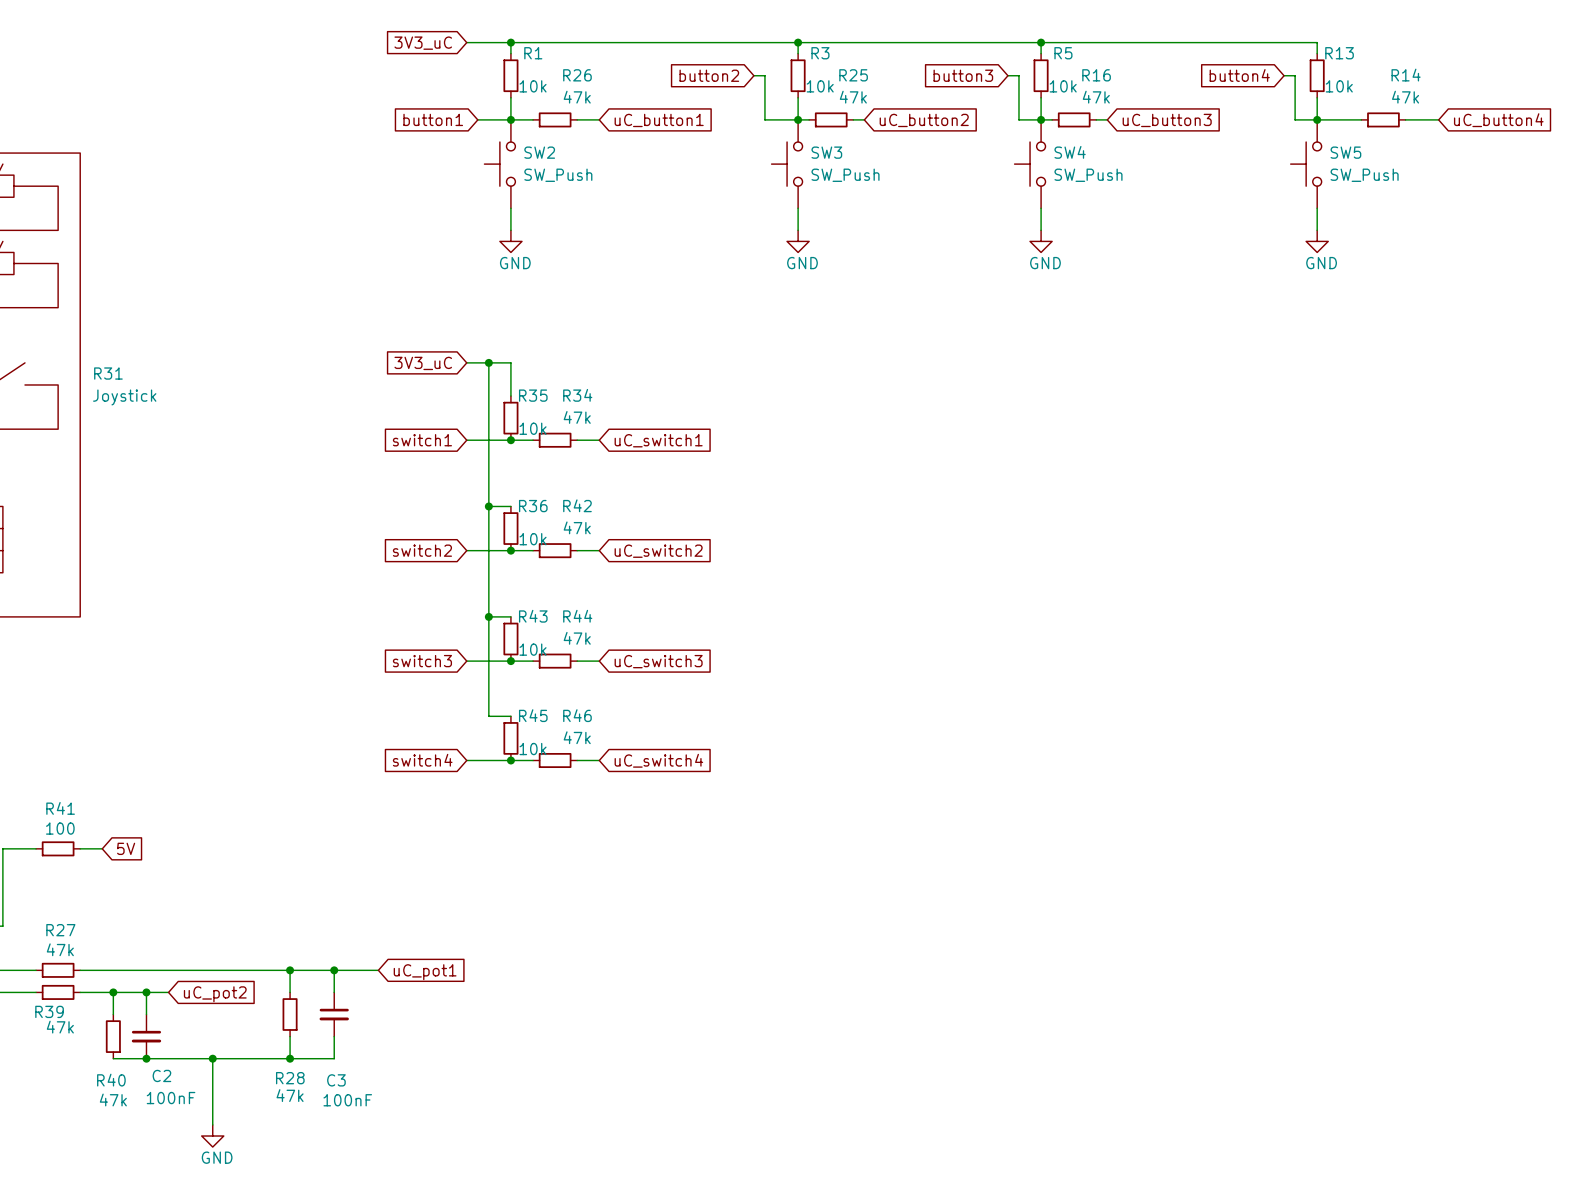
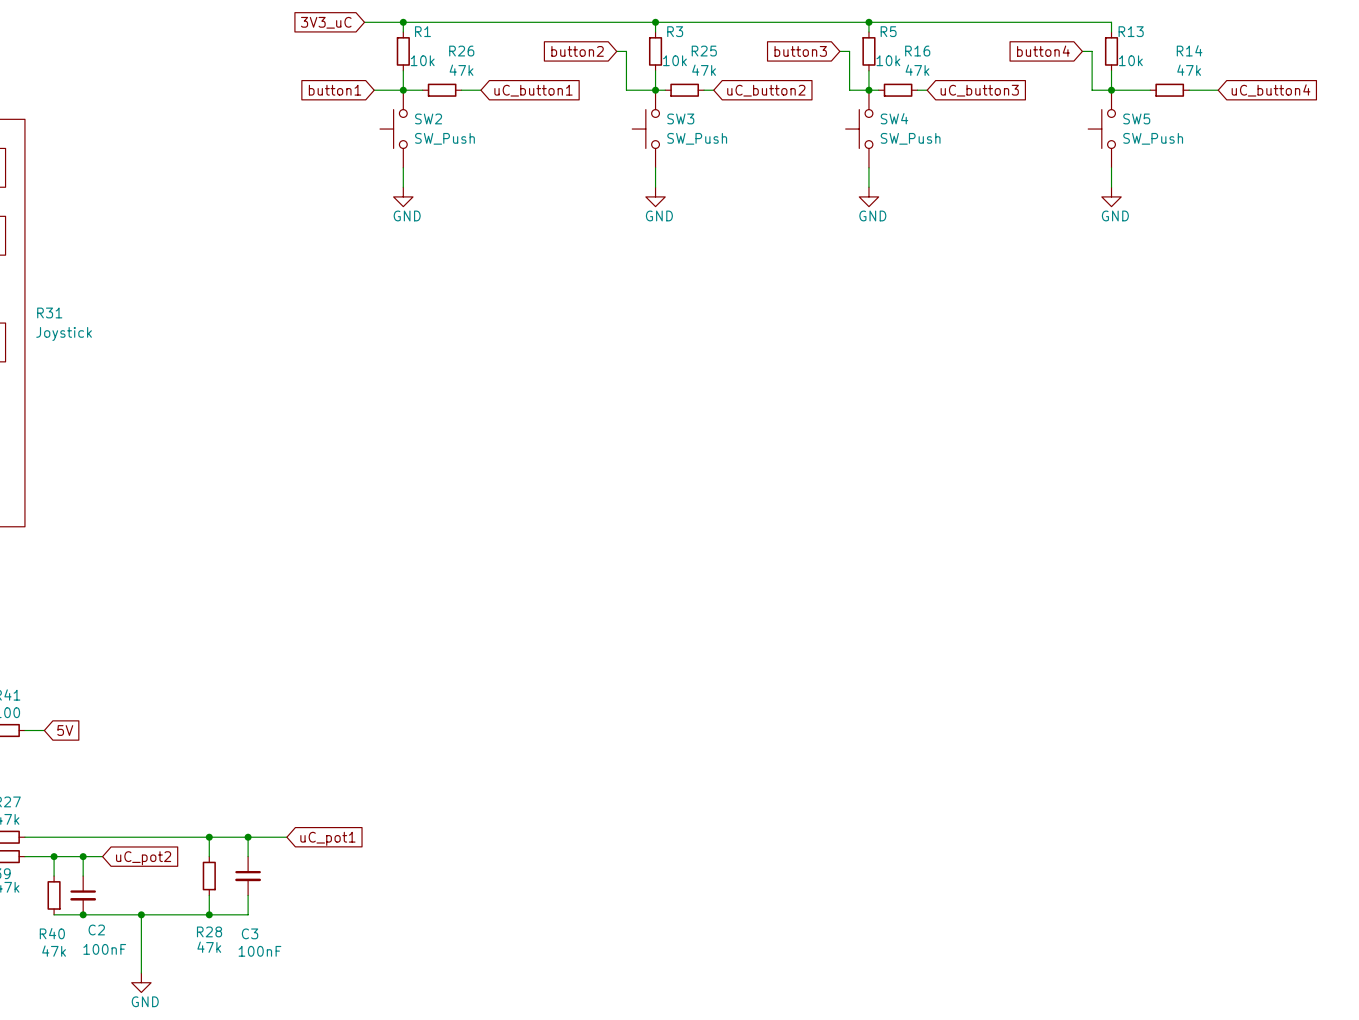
wire: (466, 362) (510, 362) (510, 396) -> none
wire: (488, 362) (488, 716) (510, 716) -> none
junction: (488, 362) -> none
global label: 3V3_uC (423, 363) -> none
R35: 10k (510, 418) -> none
global label: switch1 (422, 440) -> none
wire: (466, 440) (533, 440) -> none
junction: (510, 440) -> none
R34: 47k (555, 440) -> none
wire: (577, 440) (599, 440) -> none
global label: uC_switch1 (658, 440) -> none
wire: (488, 506) (510, 506) -> none
junction: (488, 506) -> none
R36: 10k (510, 528) -> none
global label: switch2 (422, 550) -> none
wire: (466, 550) (533, 550) -> none
junction: (510, 550) -> none
R42: 47k (555, 550) -> none
wire: (577, 550) (599, 550) -> none
global label: uC_switch2 (658, 551) -> none
wire: (488, 616) (510, 616) -> none
junction: (488, 616) -> none
R43: 10k (510, 639) -> none
global label: switch3 (422, 661) -> none
wire: (466, 661) (533, 661) -> none
junction: (510, 661) -> none
R44: 47k (555, 661) -> none
wire: (577, 661) (599, 661) -> none
global label: uC_switch3 (658, 661) -> none
R45: 10k (510, 738) -> none
global label: switch4 (422, 760) -> none
wire: (466, 760) (533, 760) -> none
junction: (510, 760) -> none
R46: 47k (555, 760) -> none
wire: (577, 760) (599, 760) -> none
global label: uC_switch4 (658, 760) -> none

